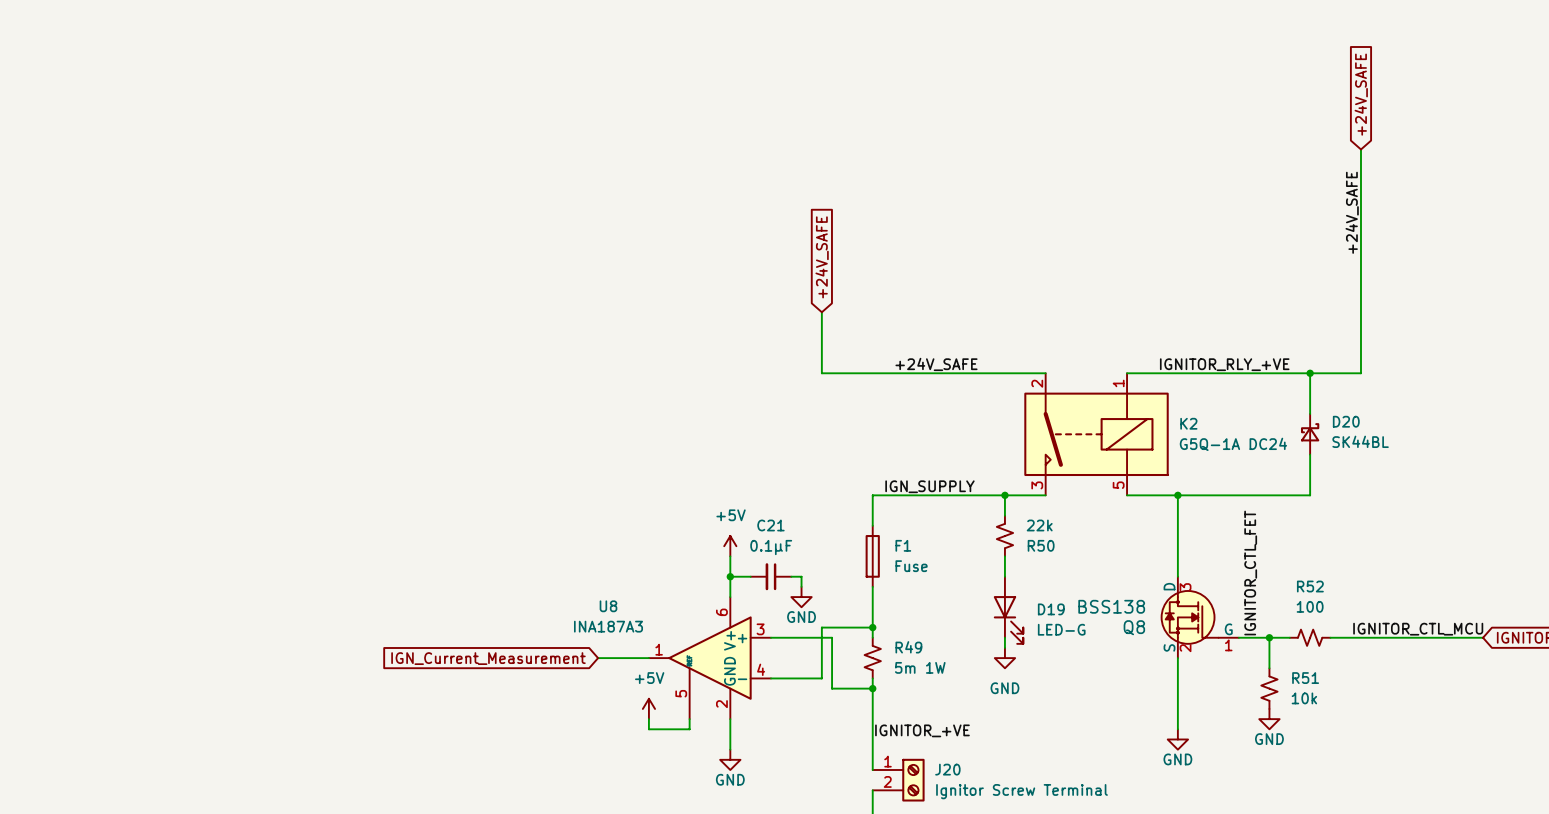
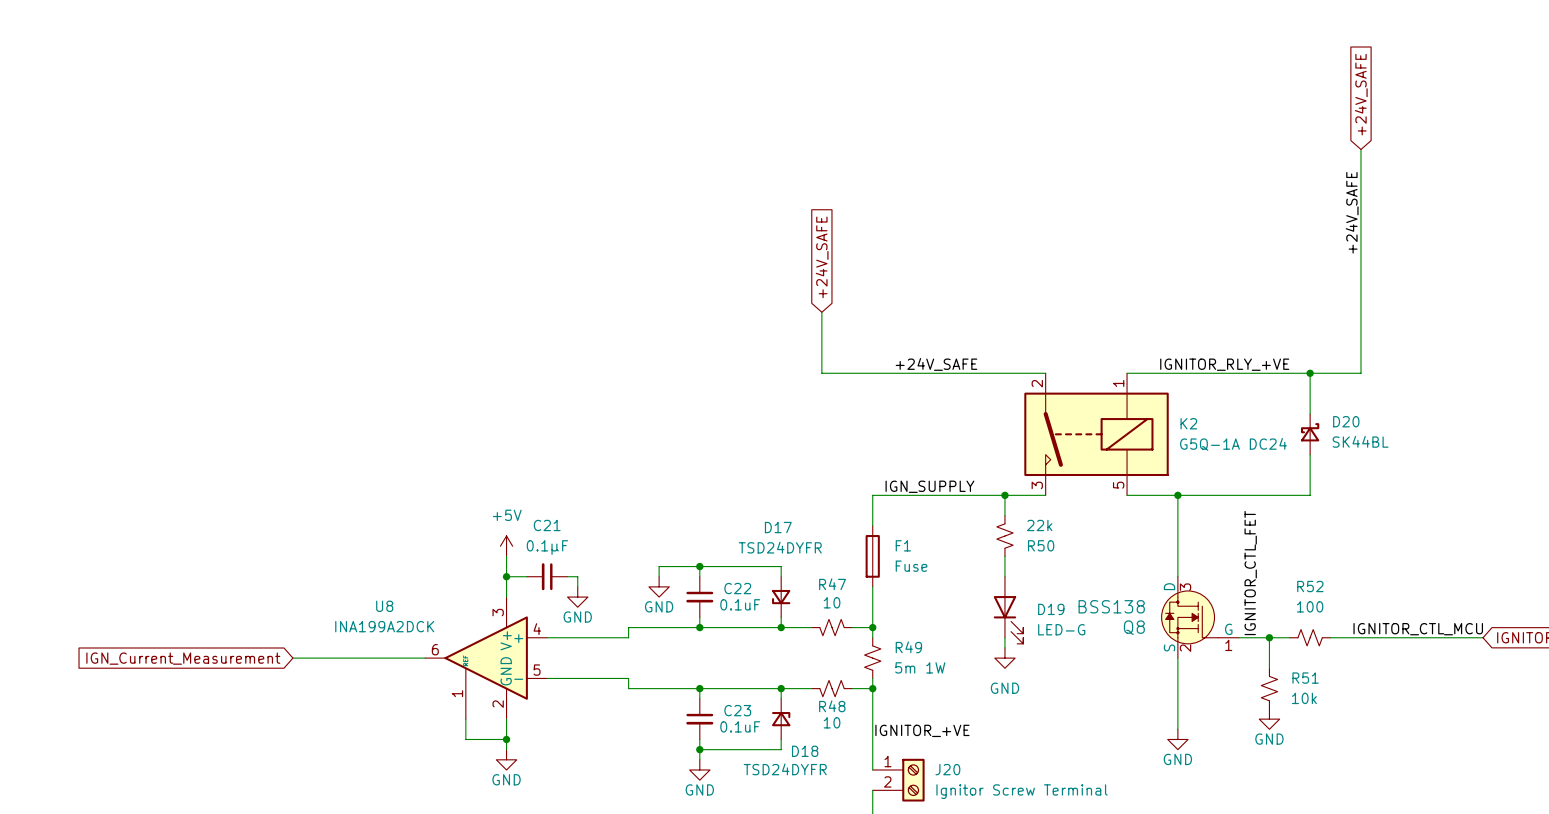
power symbol: none -> +5V (506, 546)
power symbol: +5V (730, 546) -> none
wire: none -> (506, 556) (506, 597)
wire: (730, 556) (730, 597) -> none
wire: none -> (699, 566) (699, 576)
junction: none -> (699, 566)
wire: none -> (506, 576) (526, 576)
junction: none -> (506, 576)
wire: none -> (567, 576) (577, 576) (577, 586)
wire: none -> (659, 576) (659, 566) (781, 566) (781, 576)
wire: (730, 576) (750, 576) -> none
junction: (730, 576) -> none
C21 position: (771, 576) -> (547, 576)
wire: (791, 576) (801, 576) (801, 586) -> none
power symbol: none -> GND (659, 586)
power symbol: none -> GND (577, 597)
C22: none -> 0.1uF (699, 597)
D17: none -> TSD24DYFR (781, 597)
power symbol: GND (801, 597) -> none
U8 pin number: 6 (721, 612) -> 3 (498, 612)
wire: none -> (699, 617) (699, 627)
wire: none -> (781, 617) (781, 627)
U8 value: INA187A3 (608, 626) -> INA199A2DCK (384, 626)
junction: none -> (699, 627)
junction: none -> (781, 627)
wire: none -> (811, 627) (628, 627) (628, 637) (547, 637)
R47: none -> 10 (832, 627)
wire: (852, 627) (821, 627) (821, 678) (771, 678) -> none
U8 pin number: 3 (760, 629) -> 4 (537, 629)
wire: (771, 637) (832, 637) (832, 688) (852, 688) -> none
U8 pin number: 1 (659, 649) -> 6 (435, 649)
global label: none -> IGN_Current_Measurement (183, 658)
wire: none -> (292, 658) (425, 658)
global label: IGN_Current_Measurement (488, 658) -> none
wire: (598, 658) (648, 658) -> none
U8 position: (709, 658) -> (486, 658)
U8 pin number: 4 (761, 669) -> 5 (537, 670)
wire: none -> (547, 678) (628, 678) (628, 688) (811, 688)
wire: none -> (699, 688) (699, 698)
junction: none -> (699, 688)
wire: none -> (781, 688) (781, 698)
junction: none -> (781, 688)
R48: none -> 10 (832, 688)
U8 pin number: 5 (681, 693) -> 1 (457, 693)
power symbol: +5V (648, 708) -> none
wire: none -> (465, 719) (465, 739) (506, 739)
wire: none -> (506, 719) (506, 749)
wire: (648, 719) (648, 729) (689, 729) (689, 719) -> none
C23: none -> 0.1uF (699, 719)
wire: (730, 719) (730, 749) -> none
D18: none -> TSD24DYFR (781, 719)
junction: none -> (506, 739)
wire: none -> (699, 739) (699, 759)
wire: none -> (781, 739) (781, 749) (699, 749)
junction: none -> (699, 749)
power symbol: none -> GND (506, 759)
power symbol position: GND (730, 759) -> GND (699, 769)

